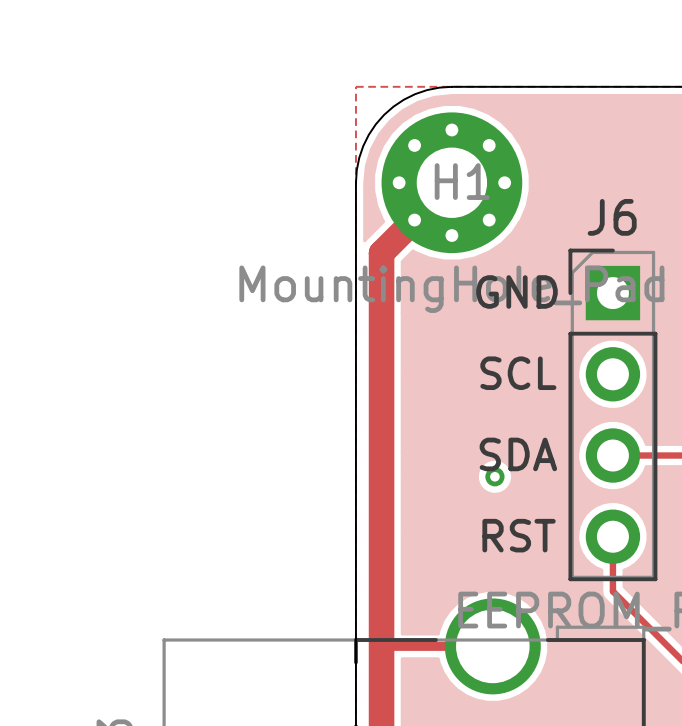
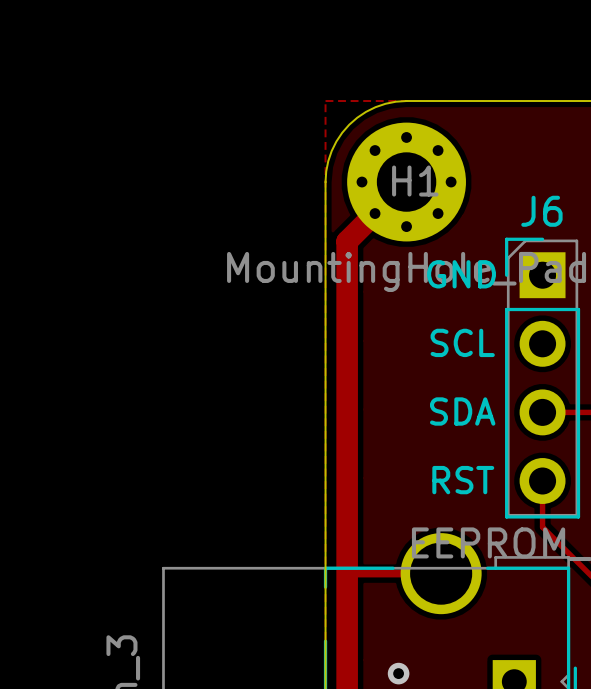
via: (494, 476) -> none

